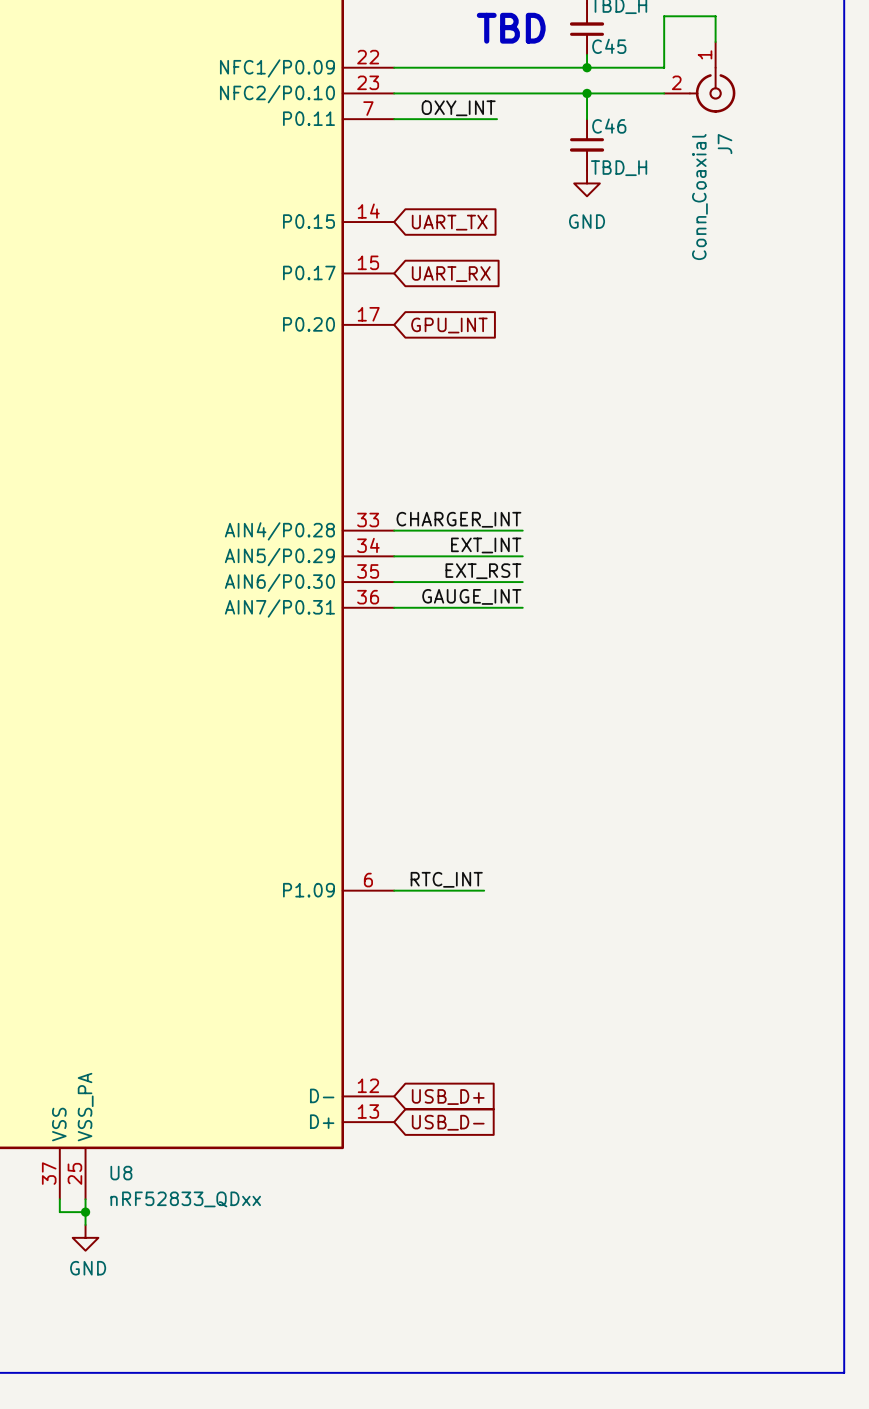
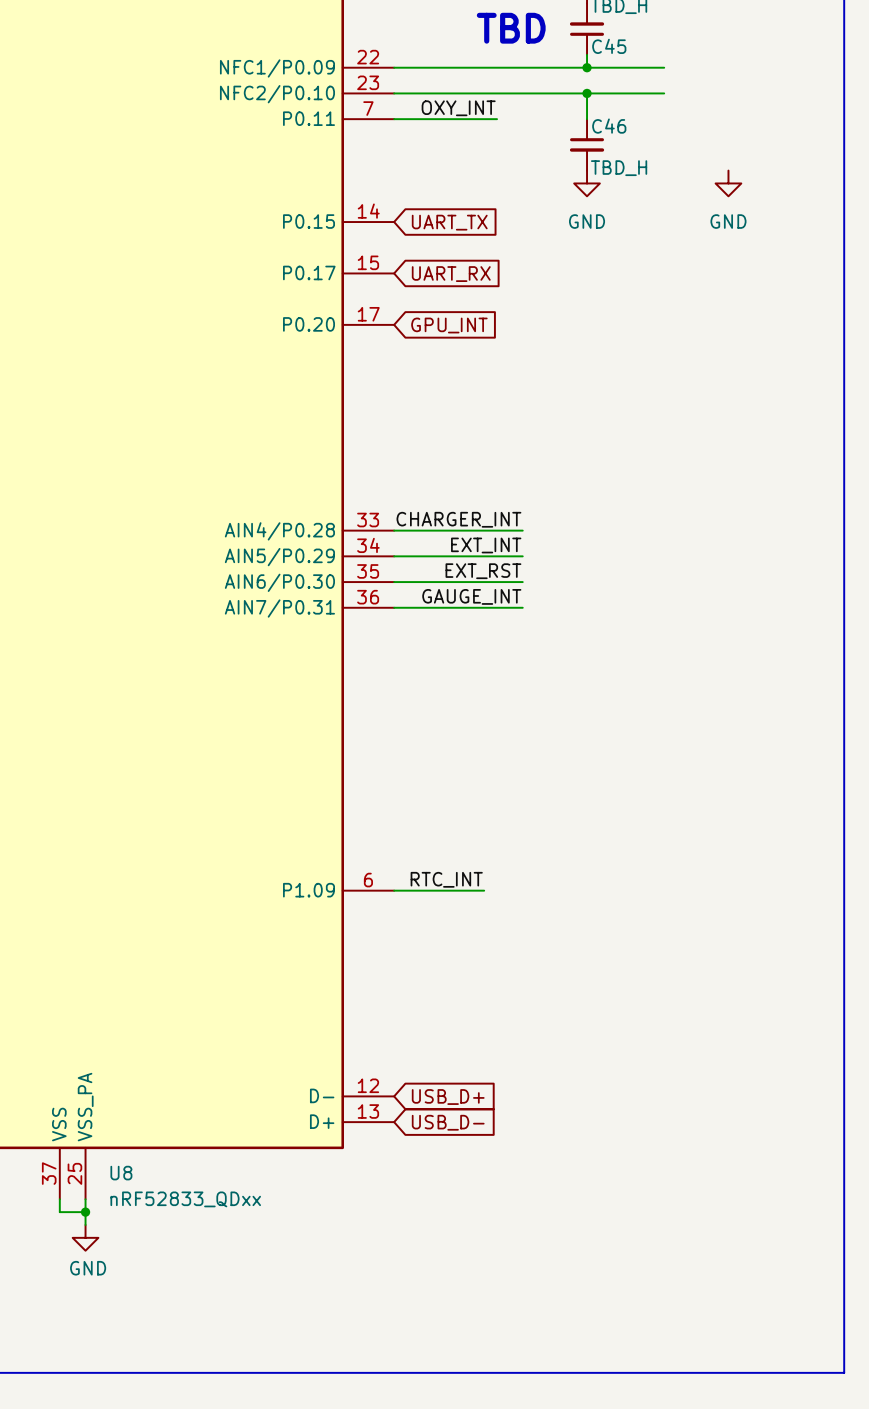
wire: (715, 42) (715, 16) (664, 16) (664, 67) -> none
J7: Conn_Coaxial (699, 77) -> none
power symbol: none -> GND (728, 183)

